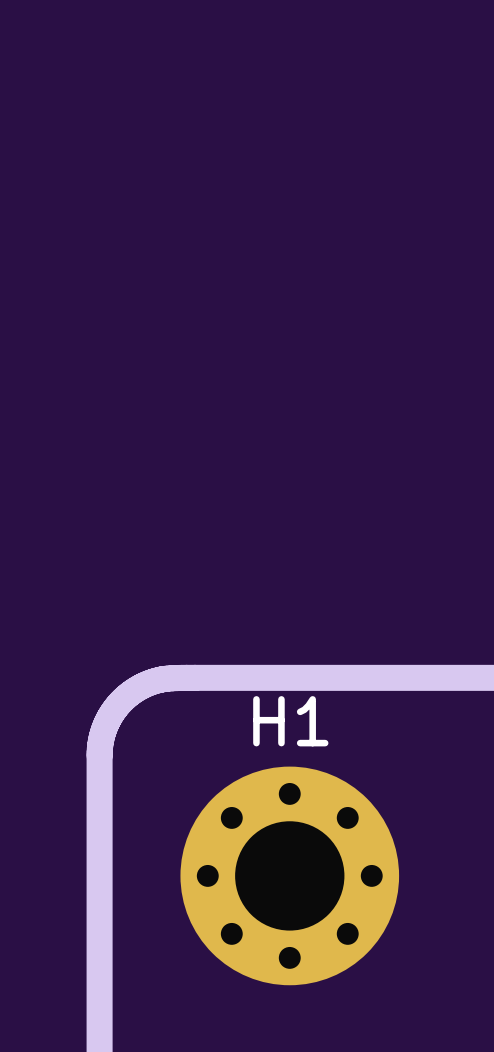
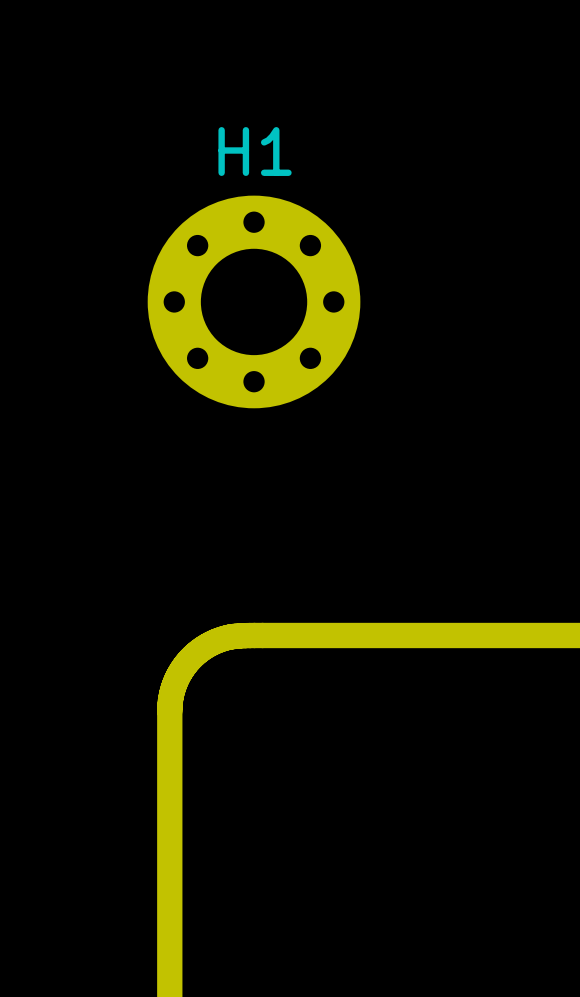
H1 position: (289, 875) -> (254, 301)

